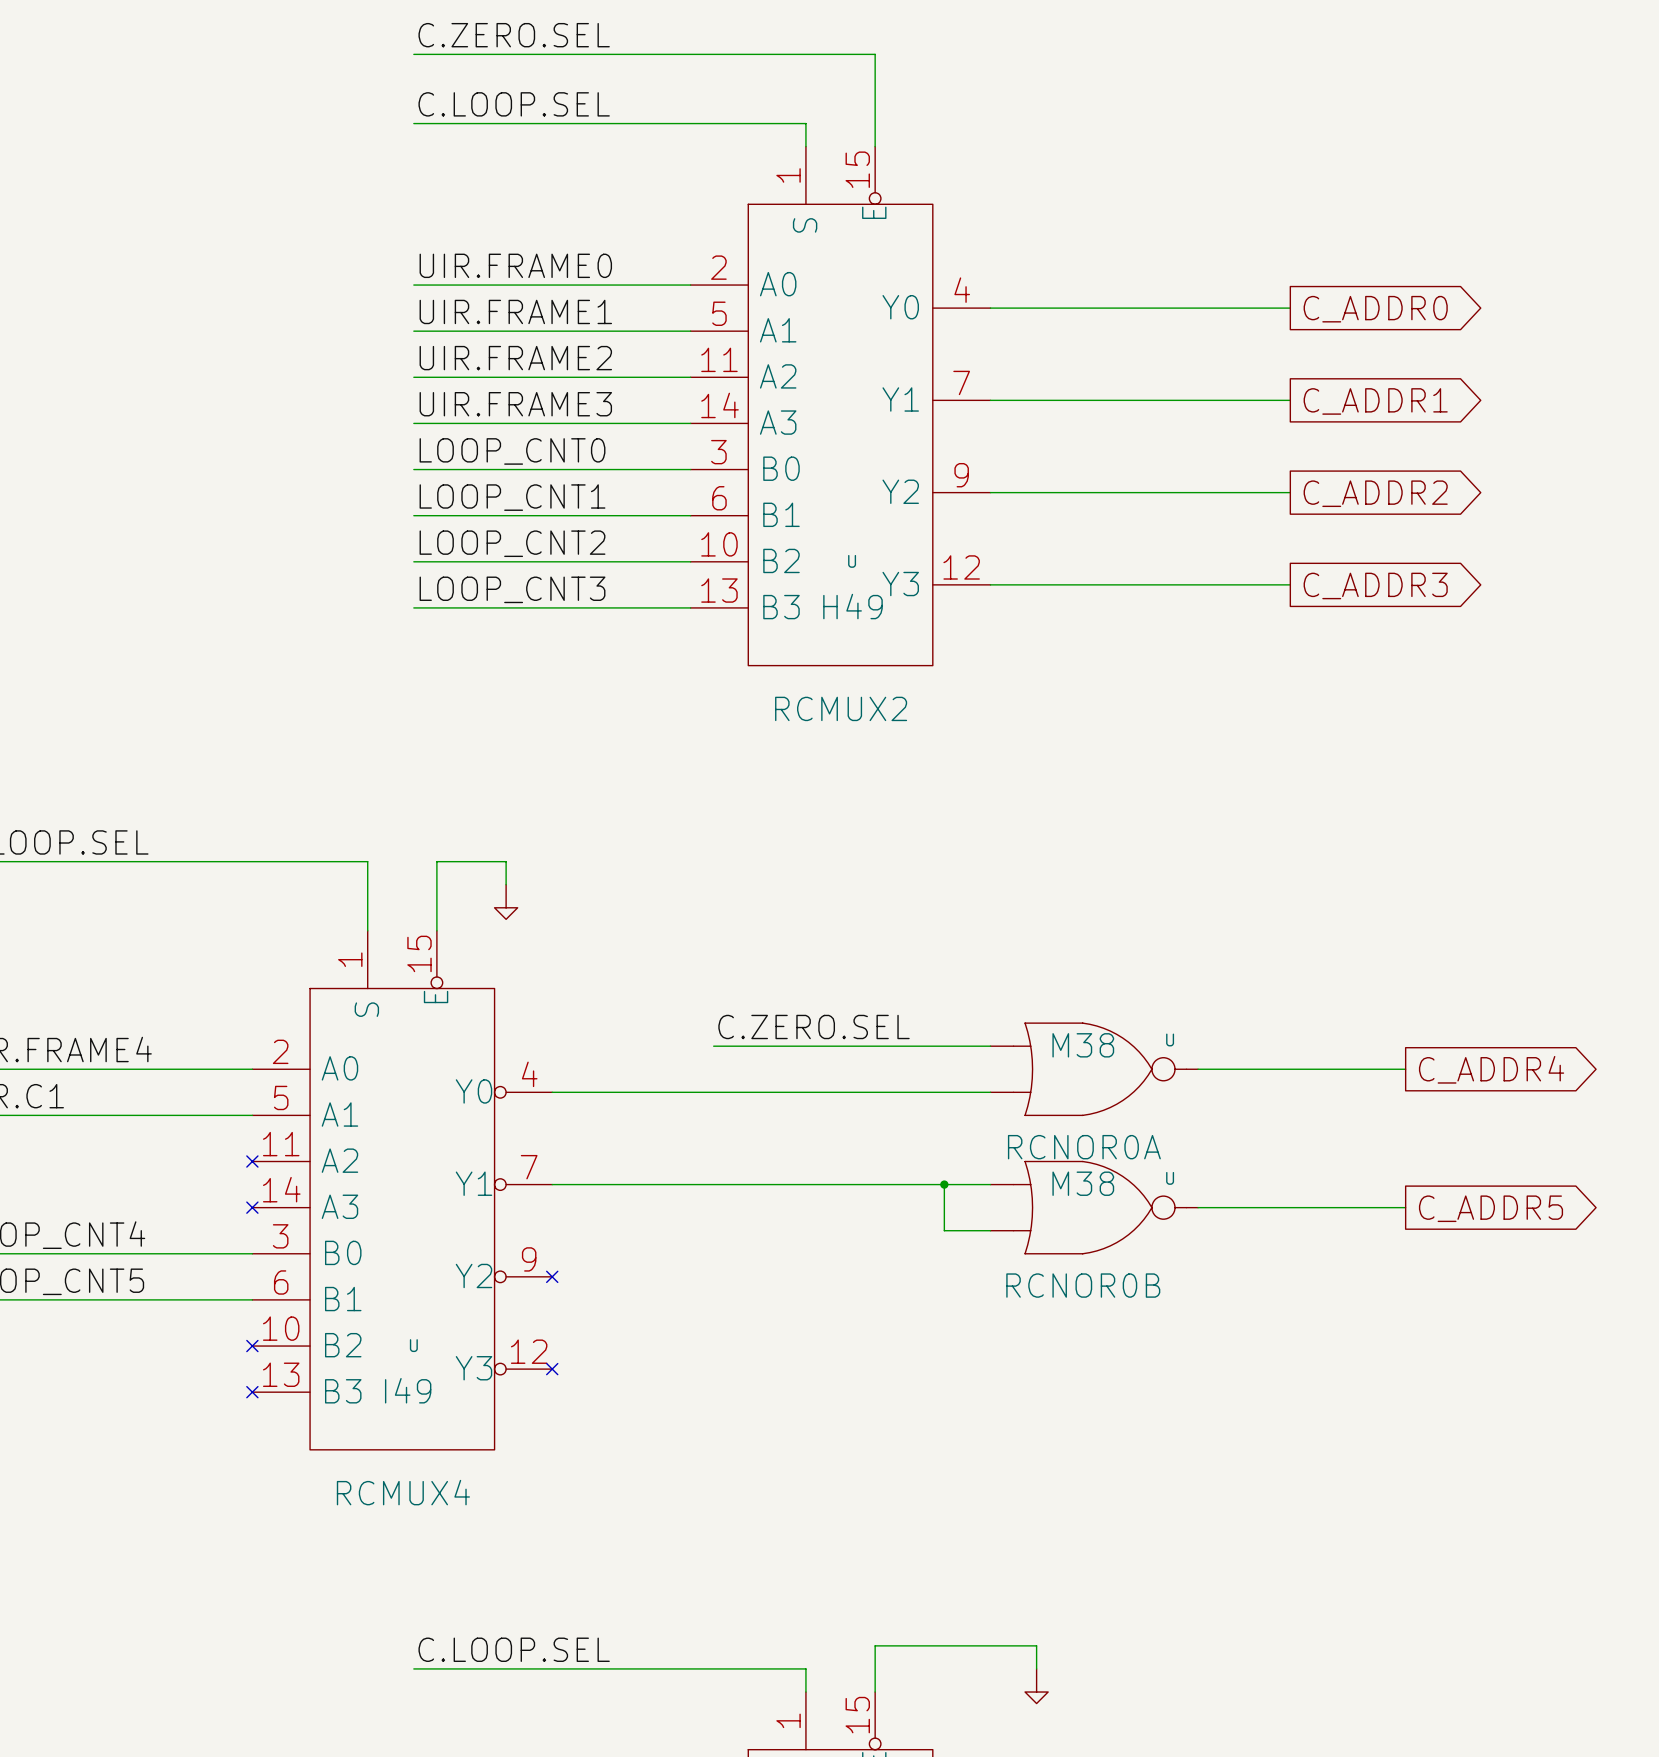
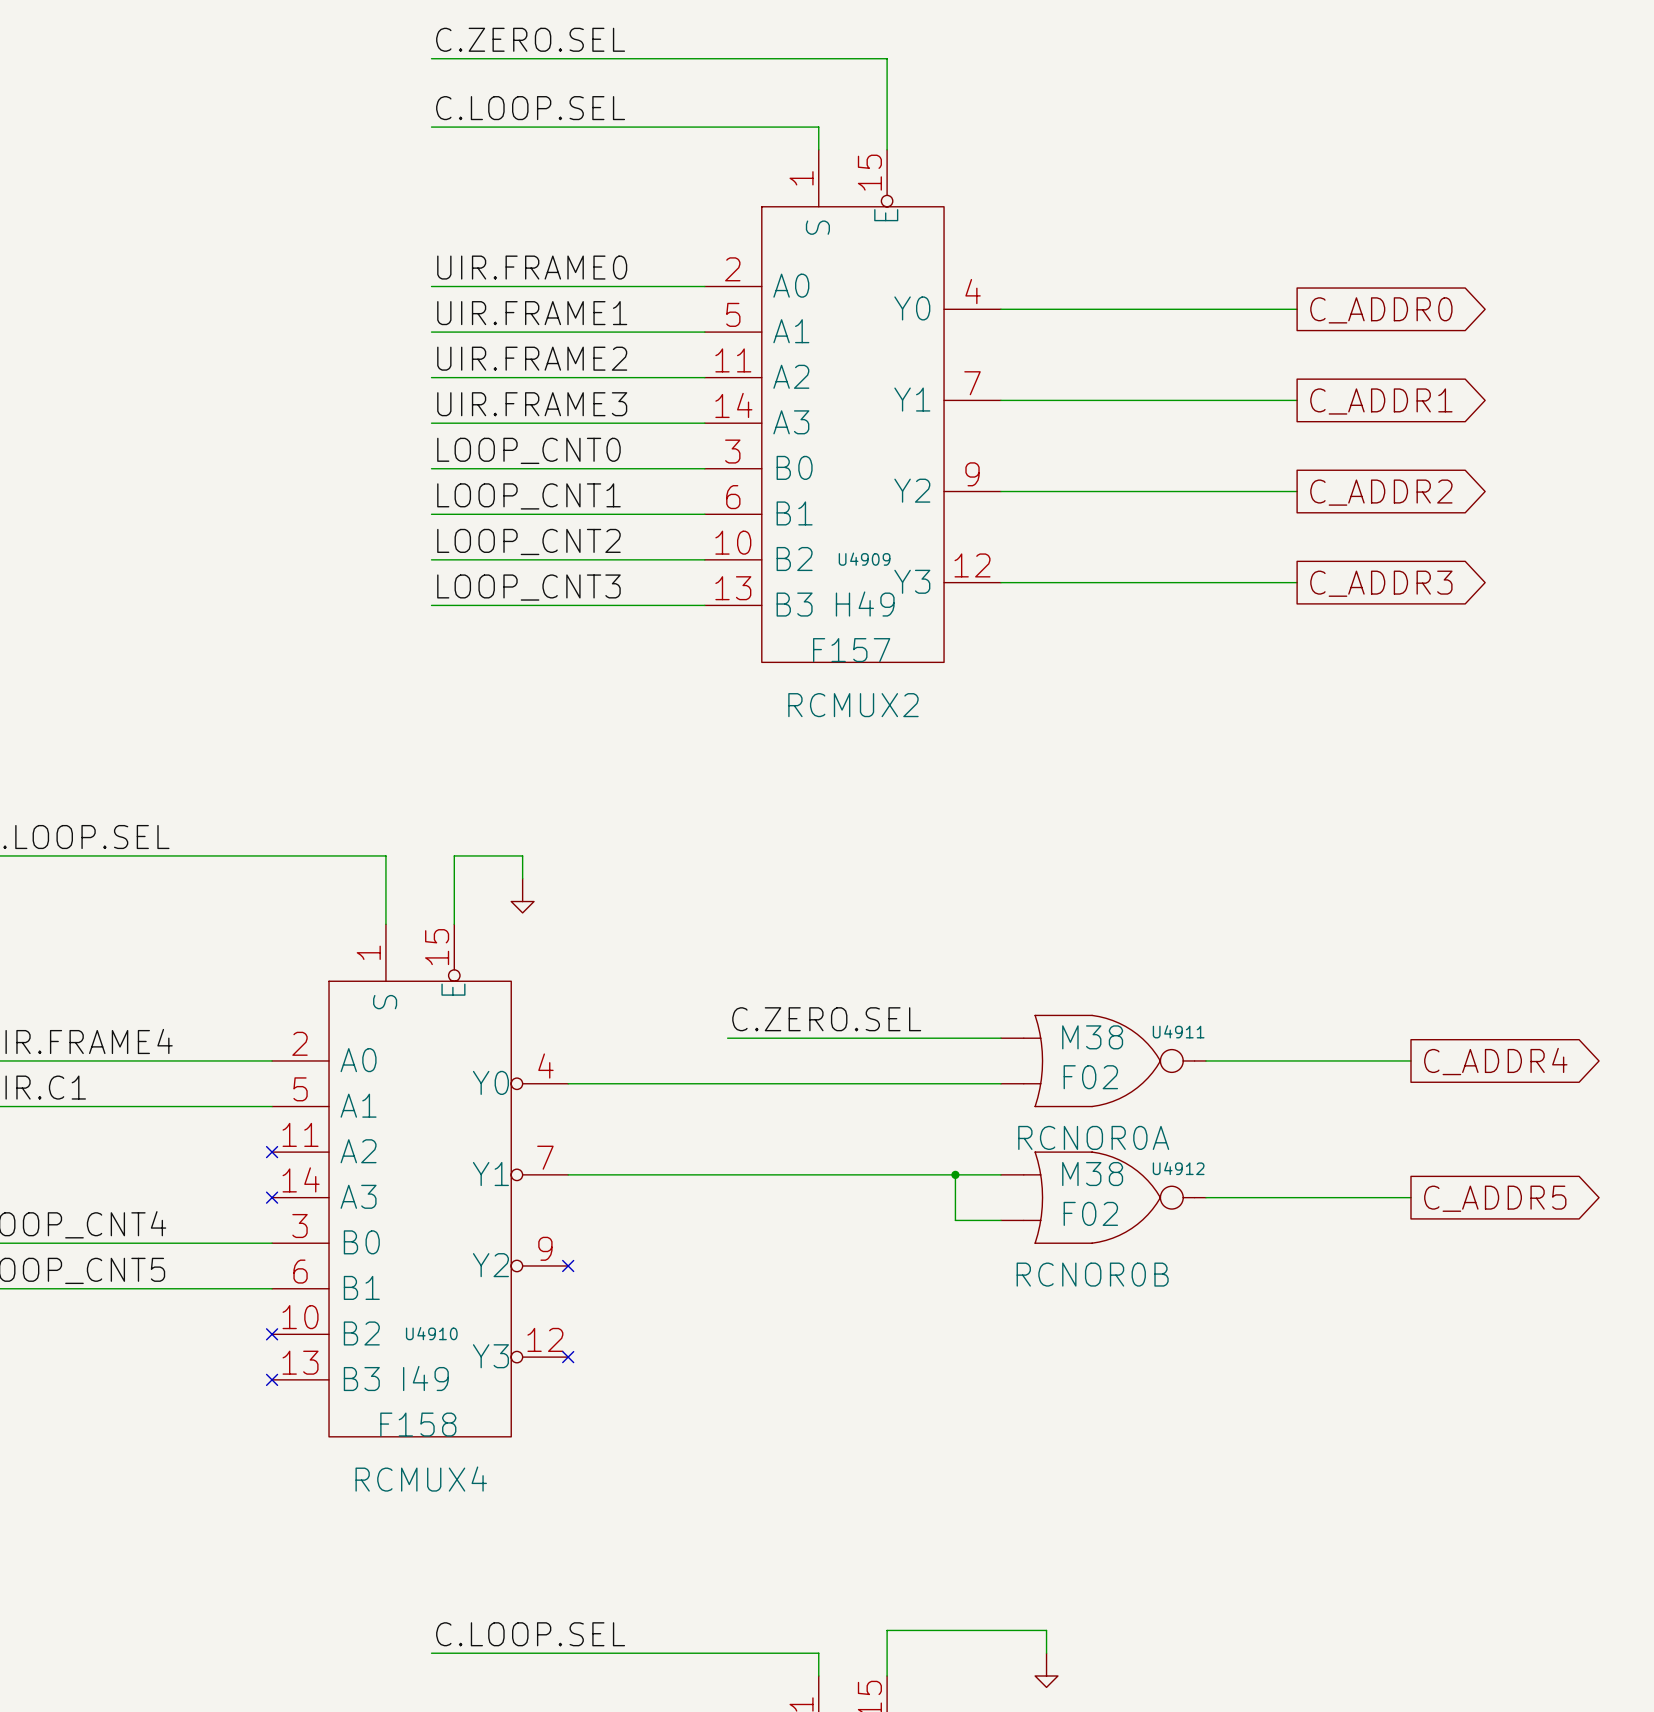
U name: U (852, 561) -> U4909 (864, 559)
U value: none -> F157 (851, 650)
U name: U (1170, 1039) -> U4911 (1178, 1031)
U value: none -> F02 (1090, 1077)
U name: U (1170, 1178) -> U4912 (1178, 1168)
U value: none -> F02 (1090, 1213)
U name: U (413, 1345) -> U4910 (431, 1333)
U value: none -> F158 (418, 1424)

